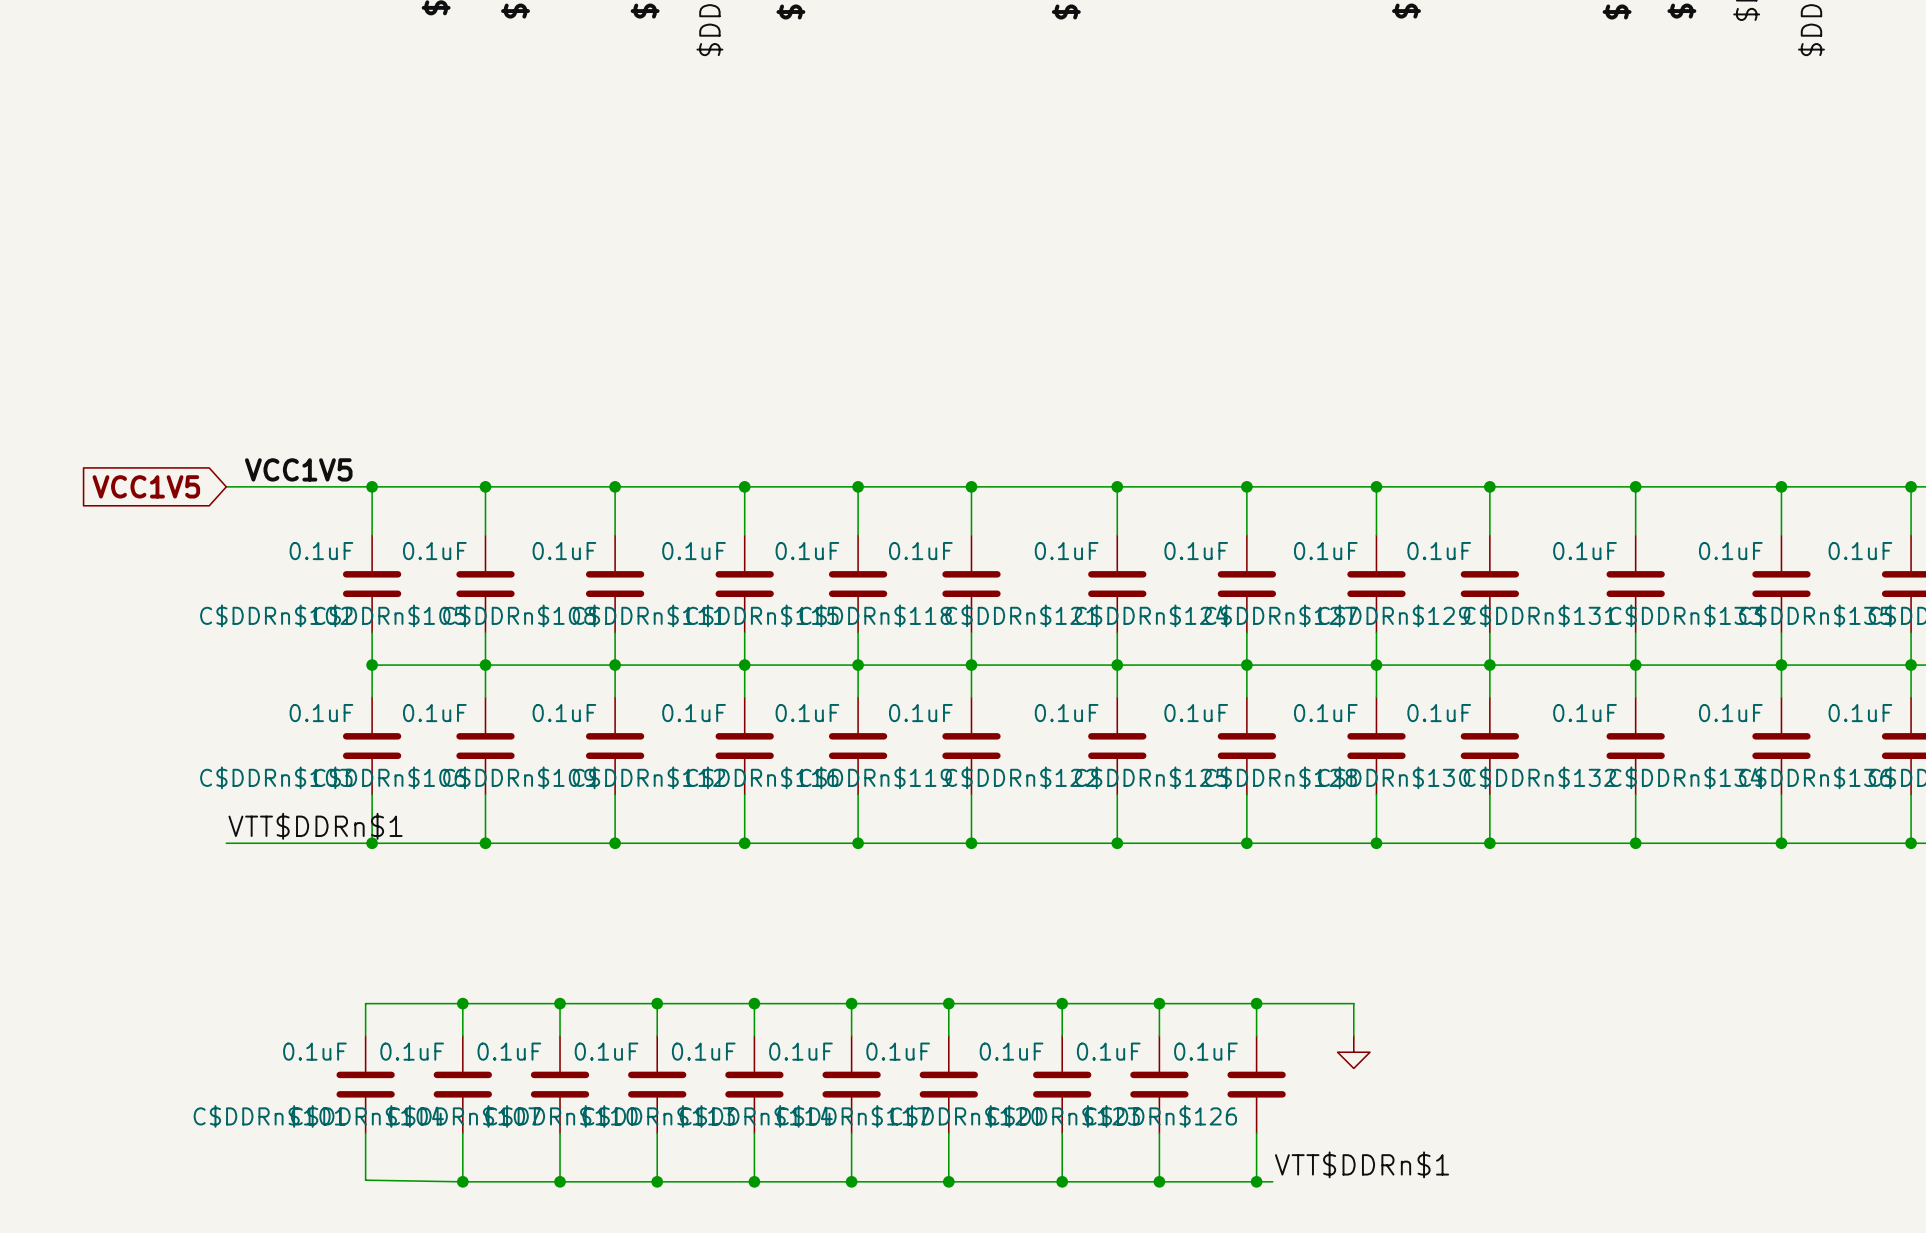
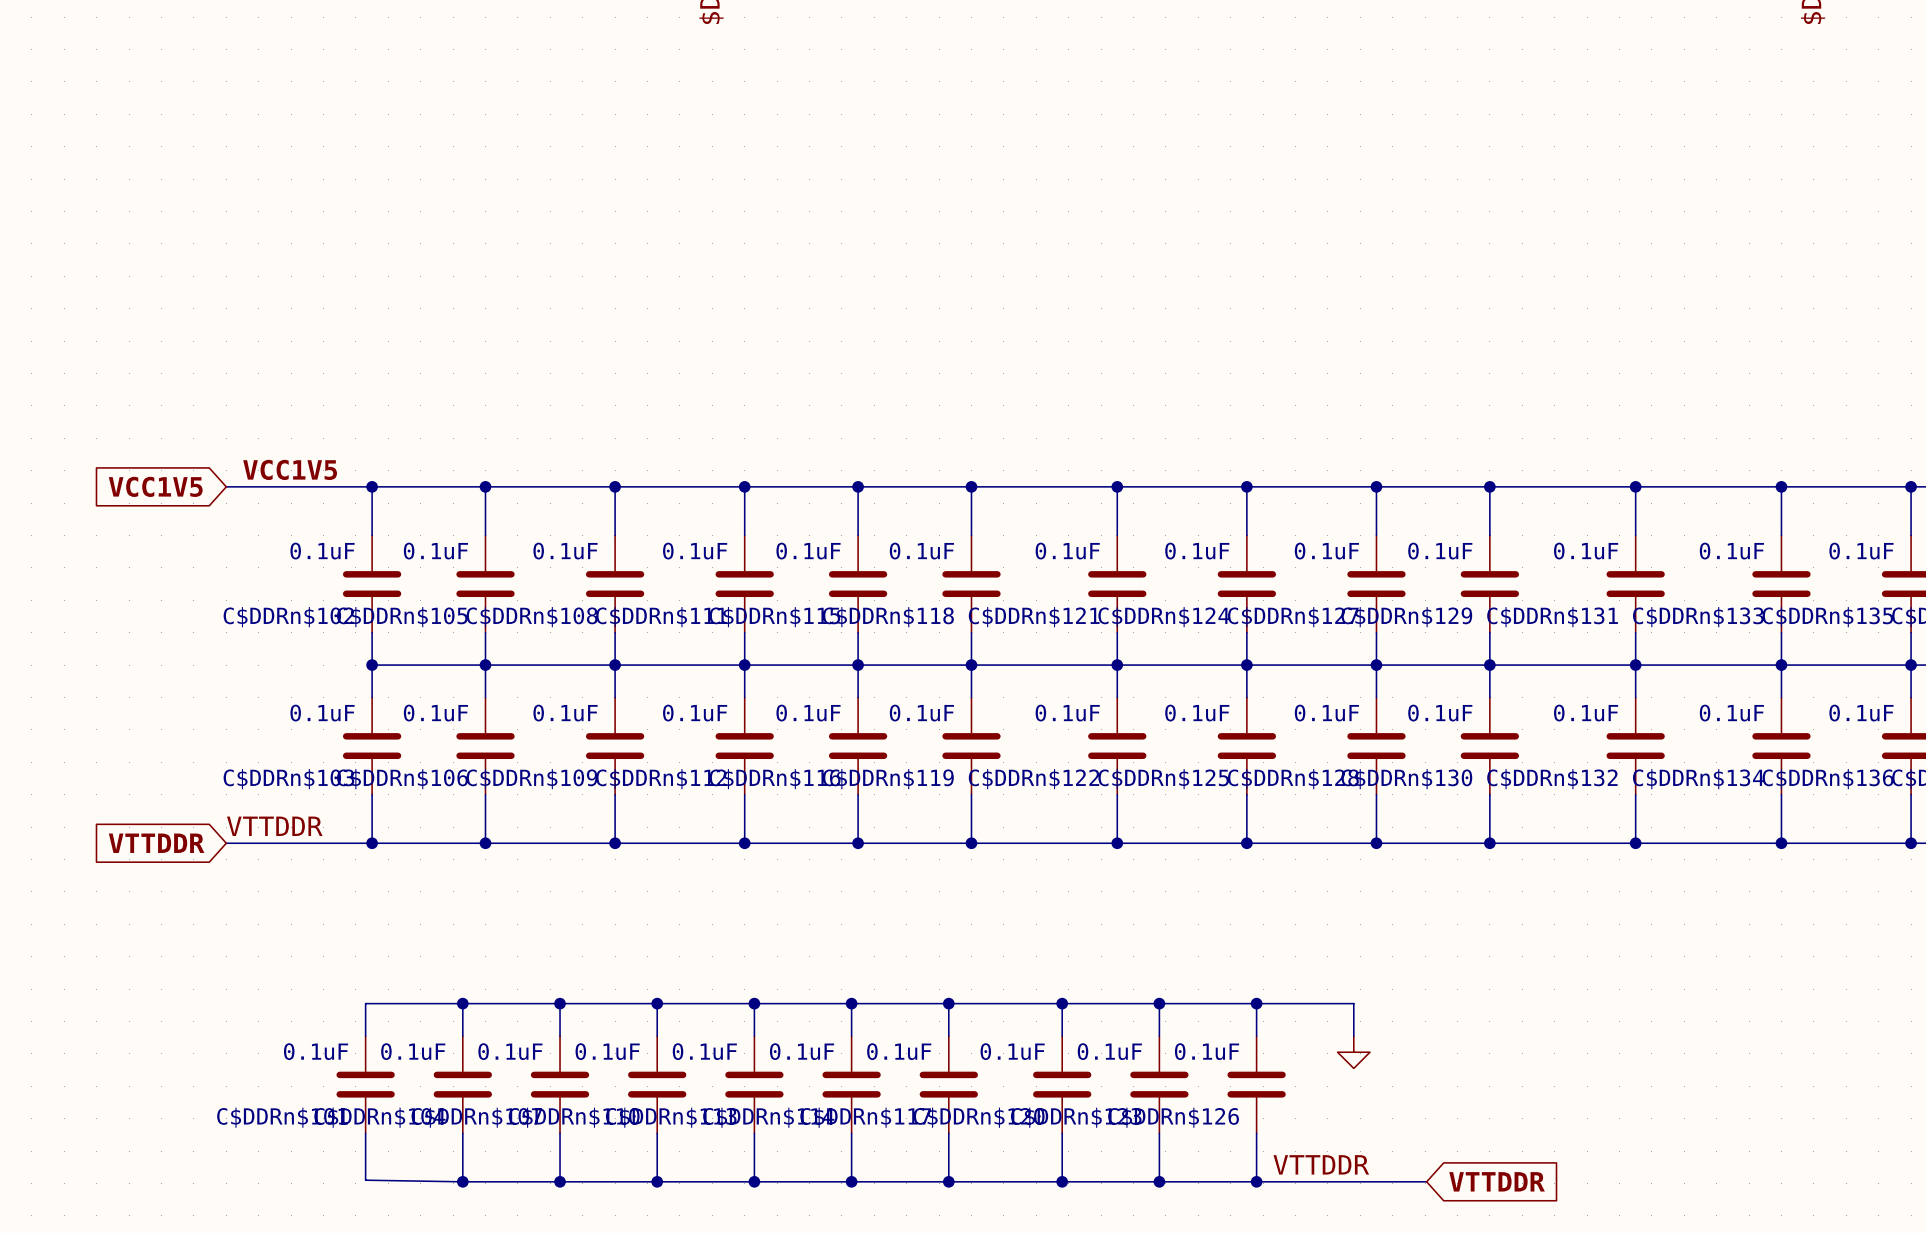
label: VTT$DDRn$1 (315, 826) -> VTTDDR (274, 826)
global label: none -> VTTDDR (156, 843)
label: VTT$DDRn$1 (1362, 1164) -> VTTDDR (1321, 1164)
wire: none -> (1272, 1181) (1426, 1181)
global label: none -> VTTDDR (1497, 1181)

